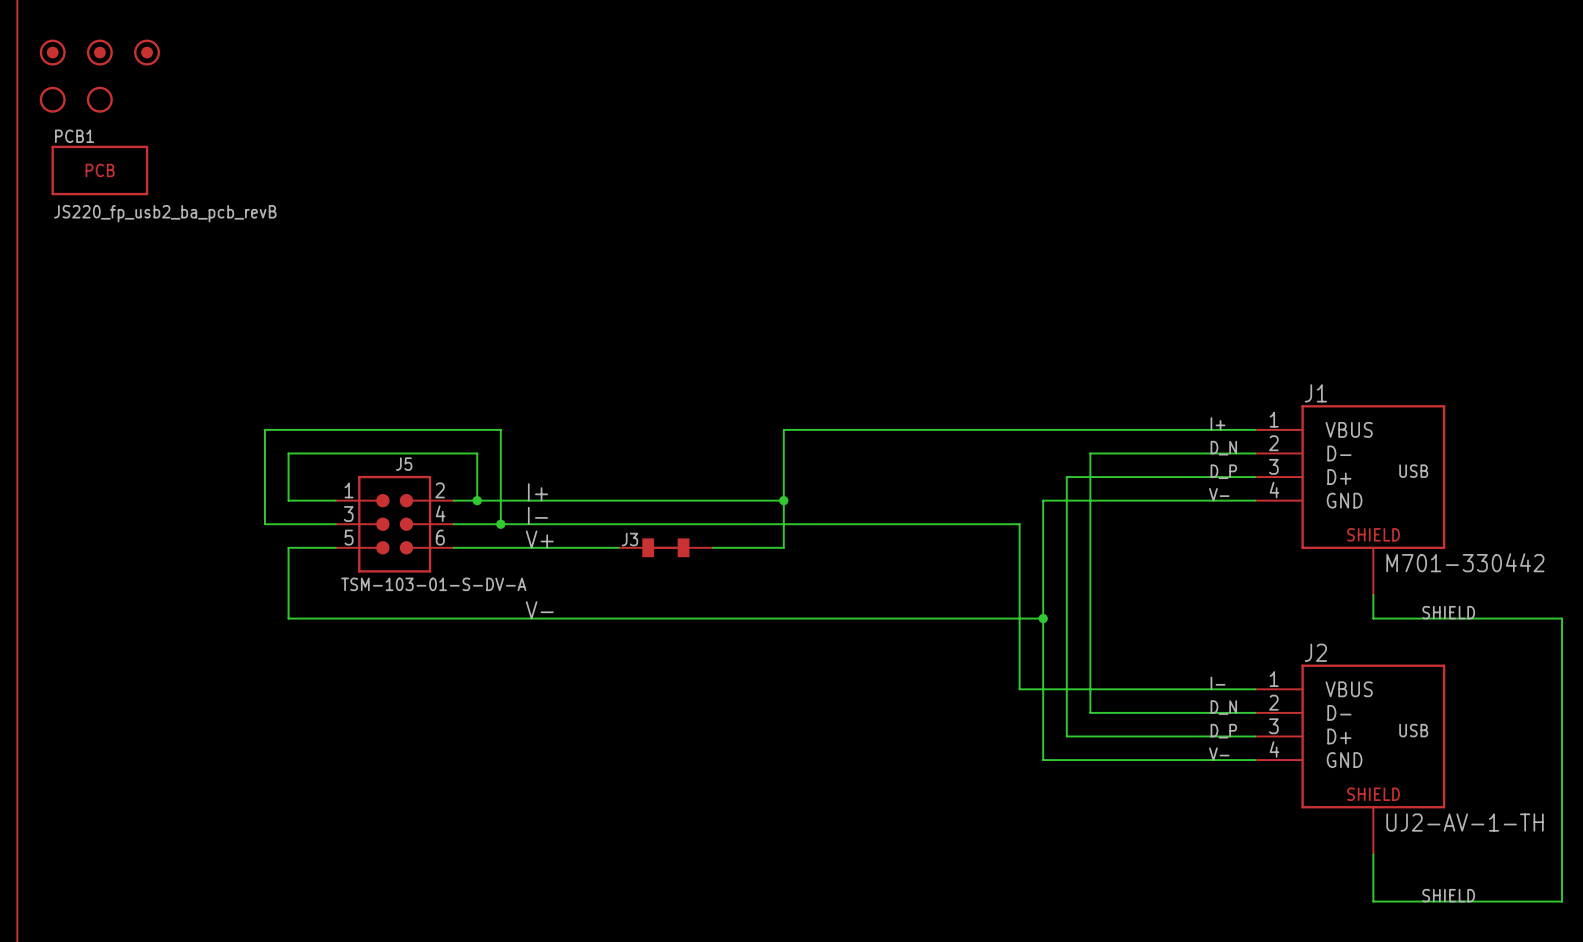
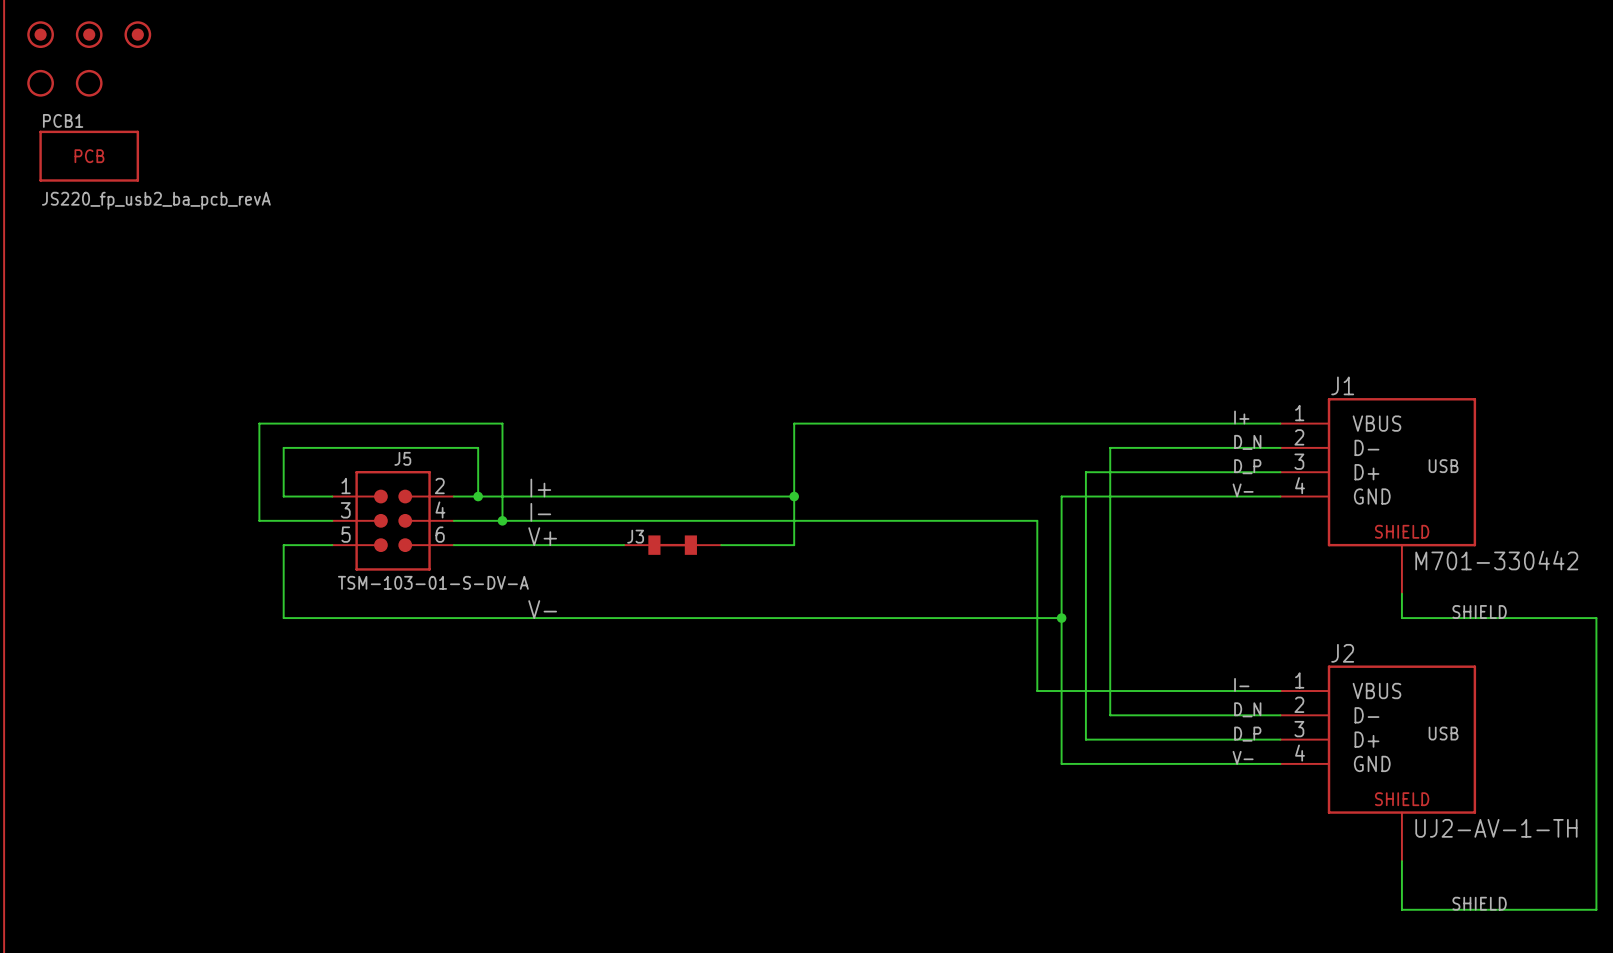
PCB1 value: JS220_fp_usb2_ba_pcb_revB (165, 213) -> JS220_fp_usb2_ba_pcb_revA (156, 200)

